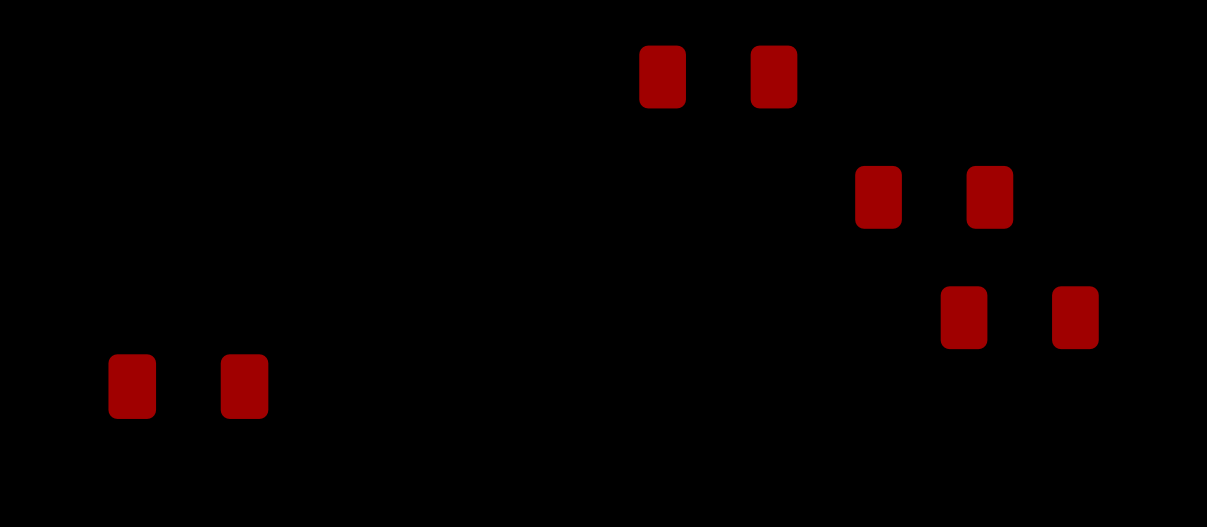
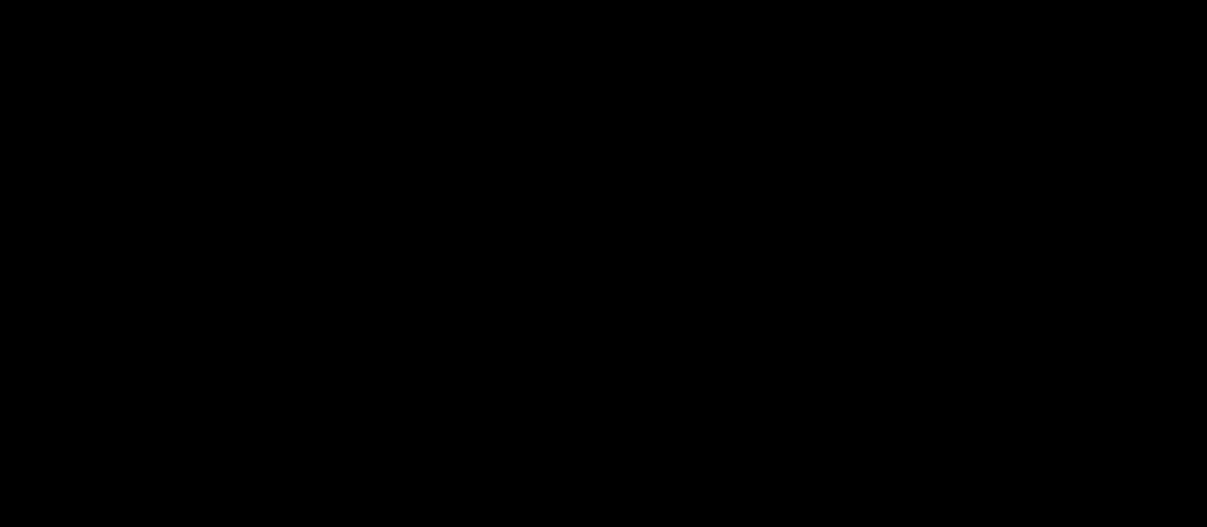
part: (718, 77) -> none
part: (934, 197) -> none
part: (1019, 317) -> none
part: (188, 386) -> none

